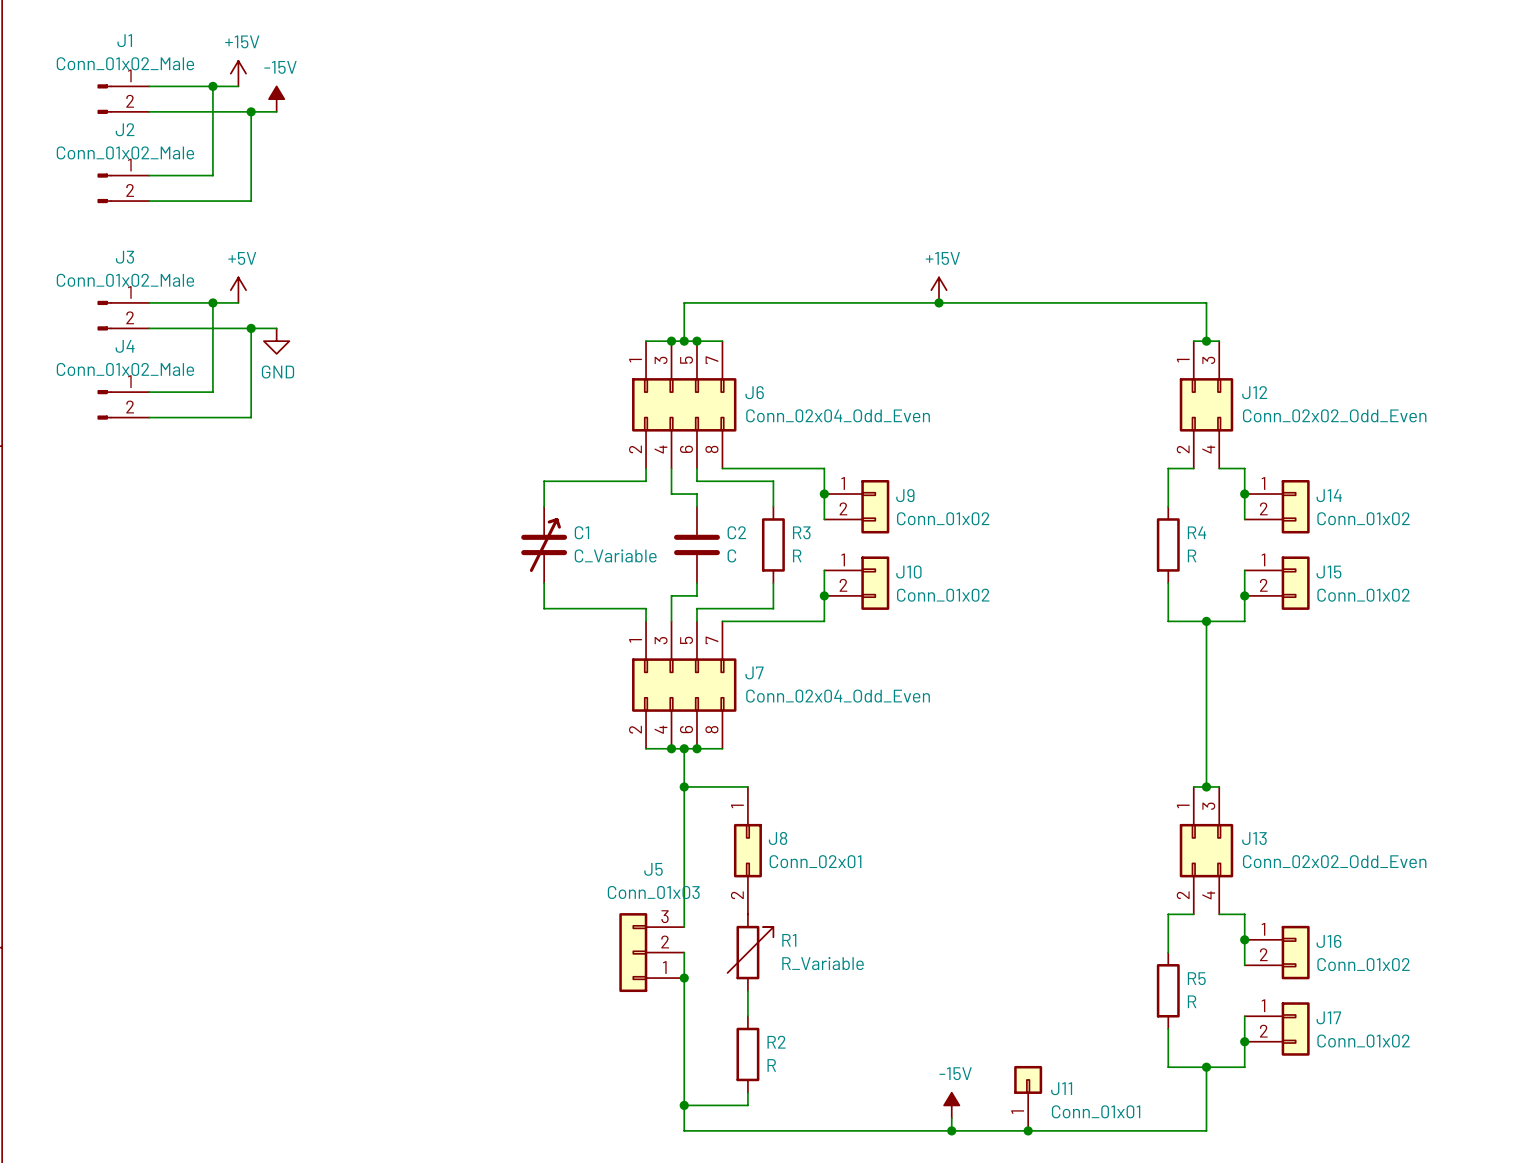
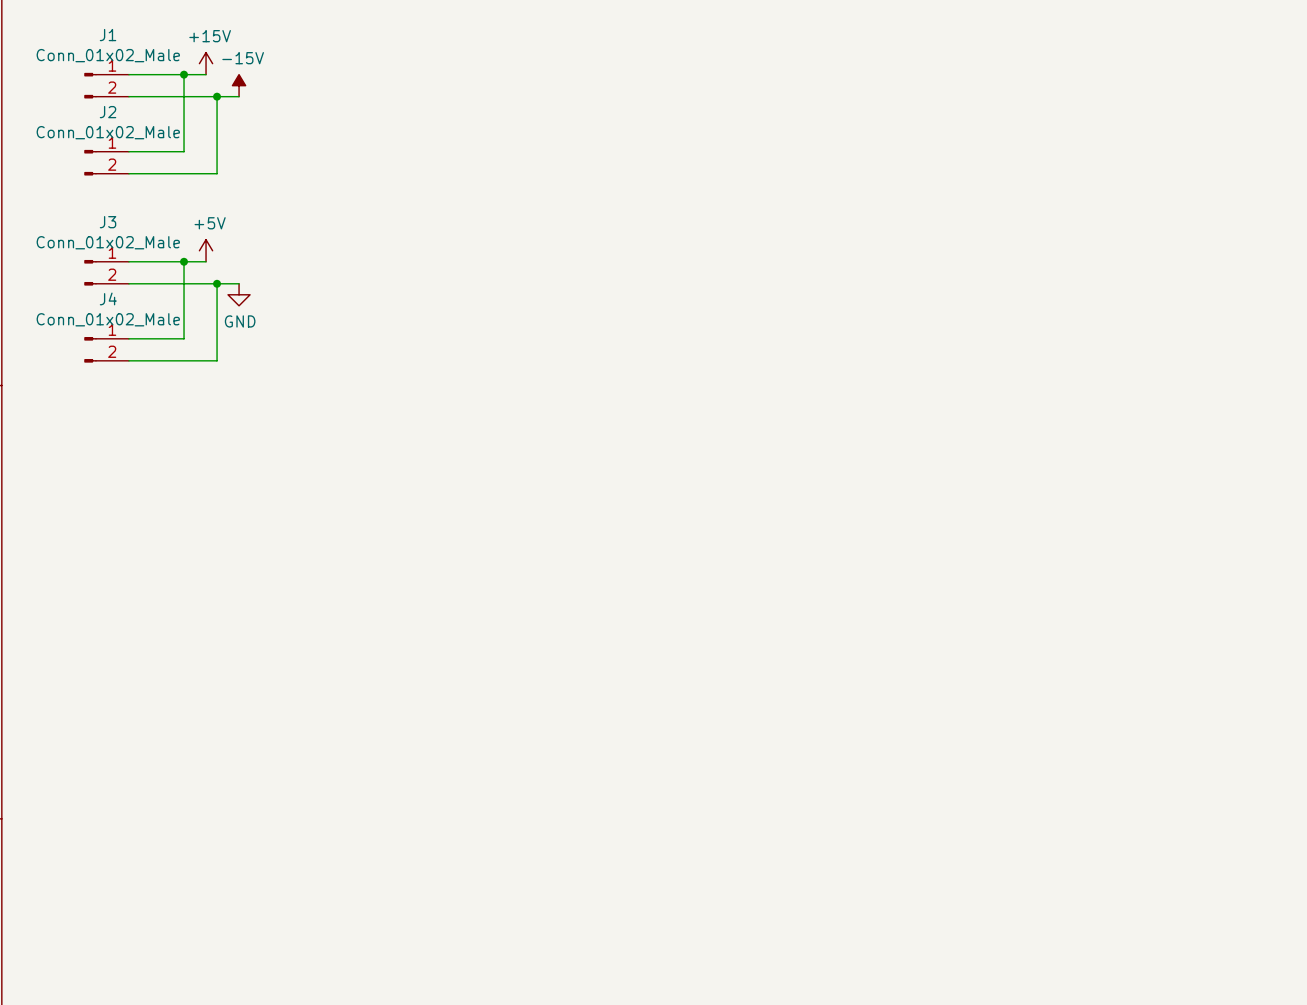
power symbol: +15V (939, 290) -> none
junction: (939, 302) -> none
wire: (646, 341) (722, 341) -> none
junction: (671, 341) -> none
wire: (684, 341) (684, 302) (1206, 302) (1206, 341) -> none
junction: (684, 341) -> none
junction: (696, 341) -> none
wire: (1193, 341) (1219, 341) -> none
junction: (1206, 341) -> none
J6: Conn_02x04_Odd_Even (684, 404) -> none
J12: Conn_02x02_Odd_Even (1206, 404) -> none
wire: (646, 468) (646, 481) (544, 481) (544, 506) -> none
wire: (671, 468) (671, 494) (696, 494) (696, 506) -> none
wire: (696, 468) (696, 481) (773, 481) (773, 506) -> none
wire: (722, 468) (824, 468) (824, 519) -> none
wire: (1193, 468) (1168, 468) (1168, 506) -> none
wire: (1219, 468) (1244, 468) (1244, 519) -> none
junction: (824, 494) -> none
junction: (1244, 494) -> none
J9: Conn_01x02 (856, 506) -> none
J14: Conn_01x02 (1277, 506) -> none
C1: C_Variable (544, 544) -> none
C2: C (696, 544) -> none
R3: R (773, 544) -> none
R4: R (1168, 544) -> none
wire: (824, 570) (824, 621) (722, 621) -> none
wire: (1244, 570) (1244, 621) (1168, 621) (1168, 583) -> none
wire: (544, 583) (544, 608) (646, 608) (646, 621) -> none
wire: (696, 583) (696, 595) (671, 595) (671, 621) -> none
wire: (773, 583) (773, 608) (696, 608) (696, 621) -> none
J10: Conn_01x02 (856, 583) -> none
J15: Conn_01x02 (1277, 583) -> none
junction: (824, 595) -> none
junction: (1244, 595) -> none
wire: (1206, 621) (1206, 786) -> none
junction: (1206, 621) -> none
J7: Conn_02x04_Odd_Even (684, 685) -> none
wire: (646, 748) (722, 748) -> none
junction: (671, 748) -> none
wire: (684, 748) (684, 927) -> none
junction: (684, 748) -> none
junction: (696, 748) -> none
wire: (684, 786) (747, 786) -> none
junction: (684, 786) -> none
wire: (1193, 786) (1219, 786) -> none
junction: (1206, 786) -> none
J8: Conn_02x01 (747, 850) -> none
J13: Conn_02x02_Odd_Even (1206, 850) -> none
wire: (1193, 914) (1168, 914) (1168, 952) -> none
wire: (1219, 914) (1244, 914) (1244, 965) -> none
junction: (1244, 939) -> none
J5: Conn_01x03 (651, 952) -> none
wire: (684, 952) (684, 1130) (1206, 1130) (1206, 1067) -> none
R1: R_Variable (750, 952) -> none
J16: Conn_01x02 (1277, 952) -> none
junction: (684, 978) -> none
wire: (747, 990) (747, 1016) -> none
R5: R (1168, 990) -> none
wire: (1244, 1016) (1244, 1067) (1168, 1067) (1168, 1028) -> none
J17: Conn_01x02 (1277, 1028) -> none
junction: (1244, 1041) -> none
R2: R (747, 1054) -> none
junction: (1206, 1067) -> none
wire: (747, 1092) (747, 1105) (684, 1105) -> none
J11: Conn_01x01 (1028, 1098) -> none
junction: (684, 1105) -> none
power symbol: -15V (951, 1105) -> none
wire: (951, 1118) (951, 1130) -> none
junction: (951, 1130) -> none
junction: (1028, 1130) -> none

